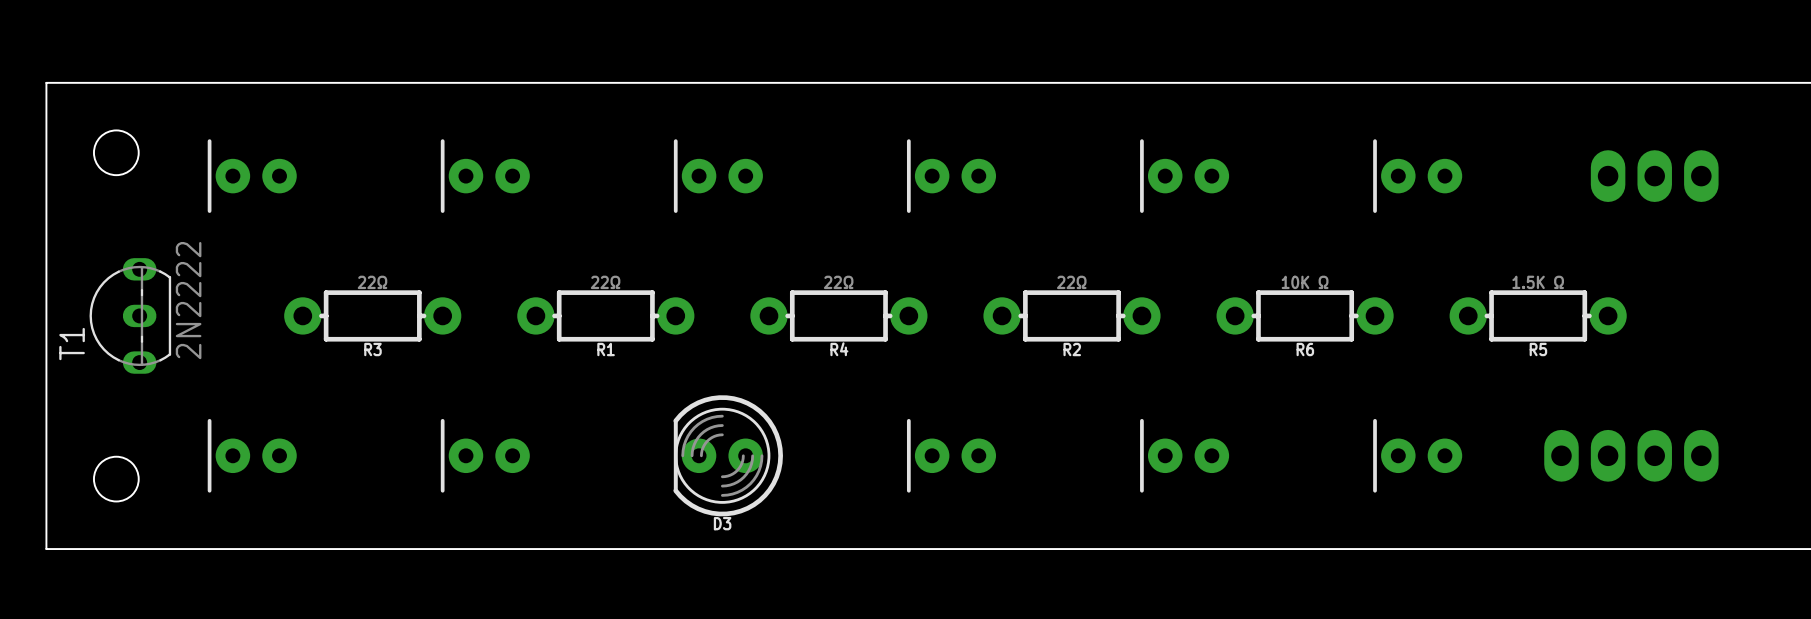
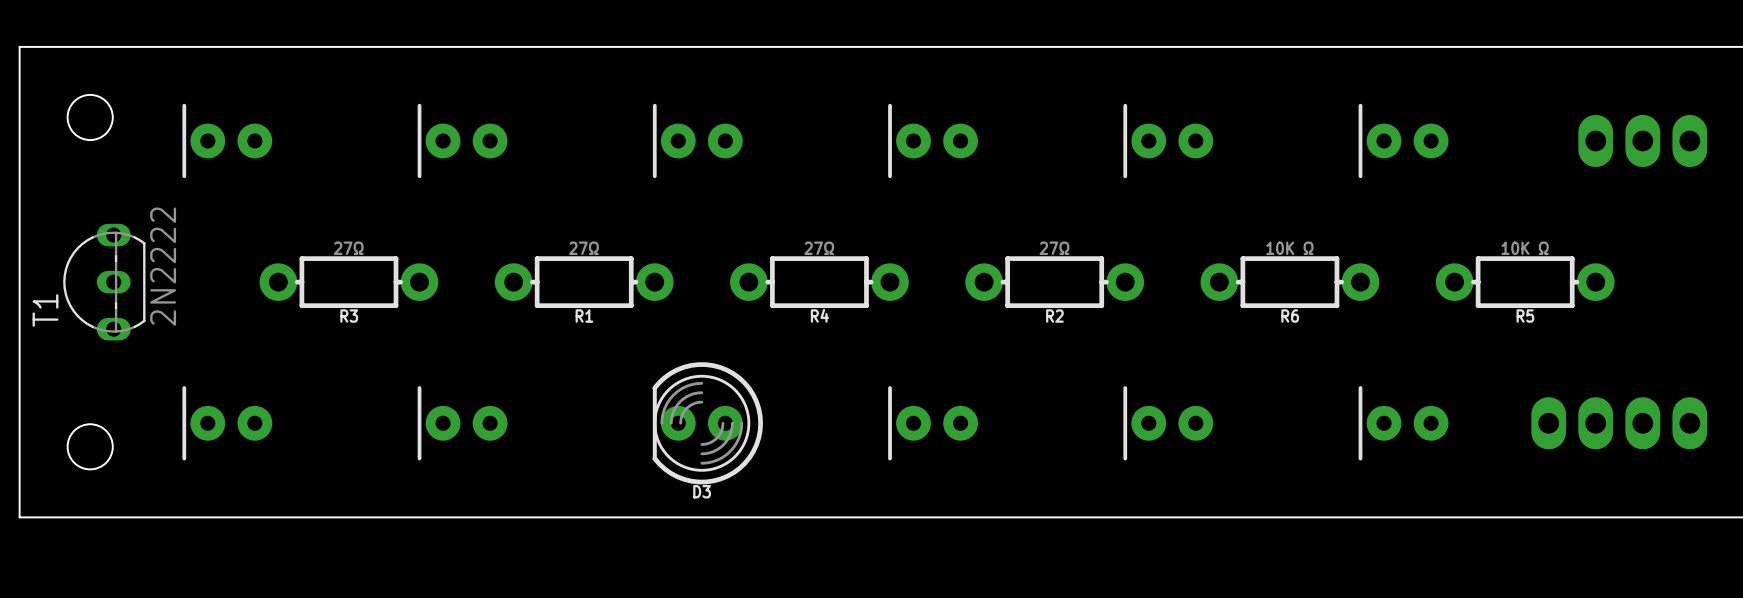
R3 value: 22Ω (372, 282) -> 27Ω (348, 248)
R1 value: 22Ω (605, 282) -> 27Ω (583, 248)
R4 value: 22Ω (838, 282) -> 27Ω (819, 248)
R2 value: 22Ω (1071, 282) -> 27Ω (1054, 248)
R5 value: 1.5K Ω (1538, 282) -> 10K Ω (1525, 248)

